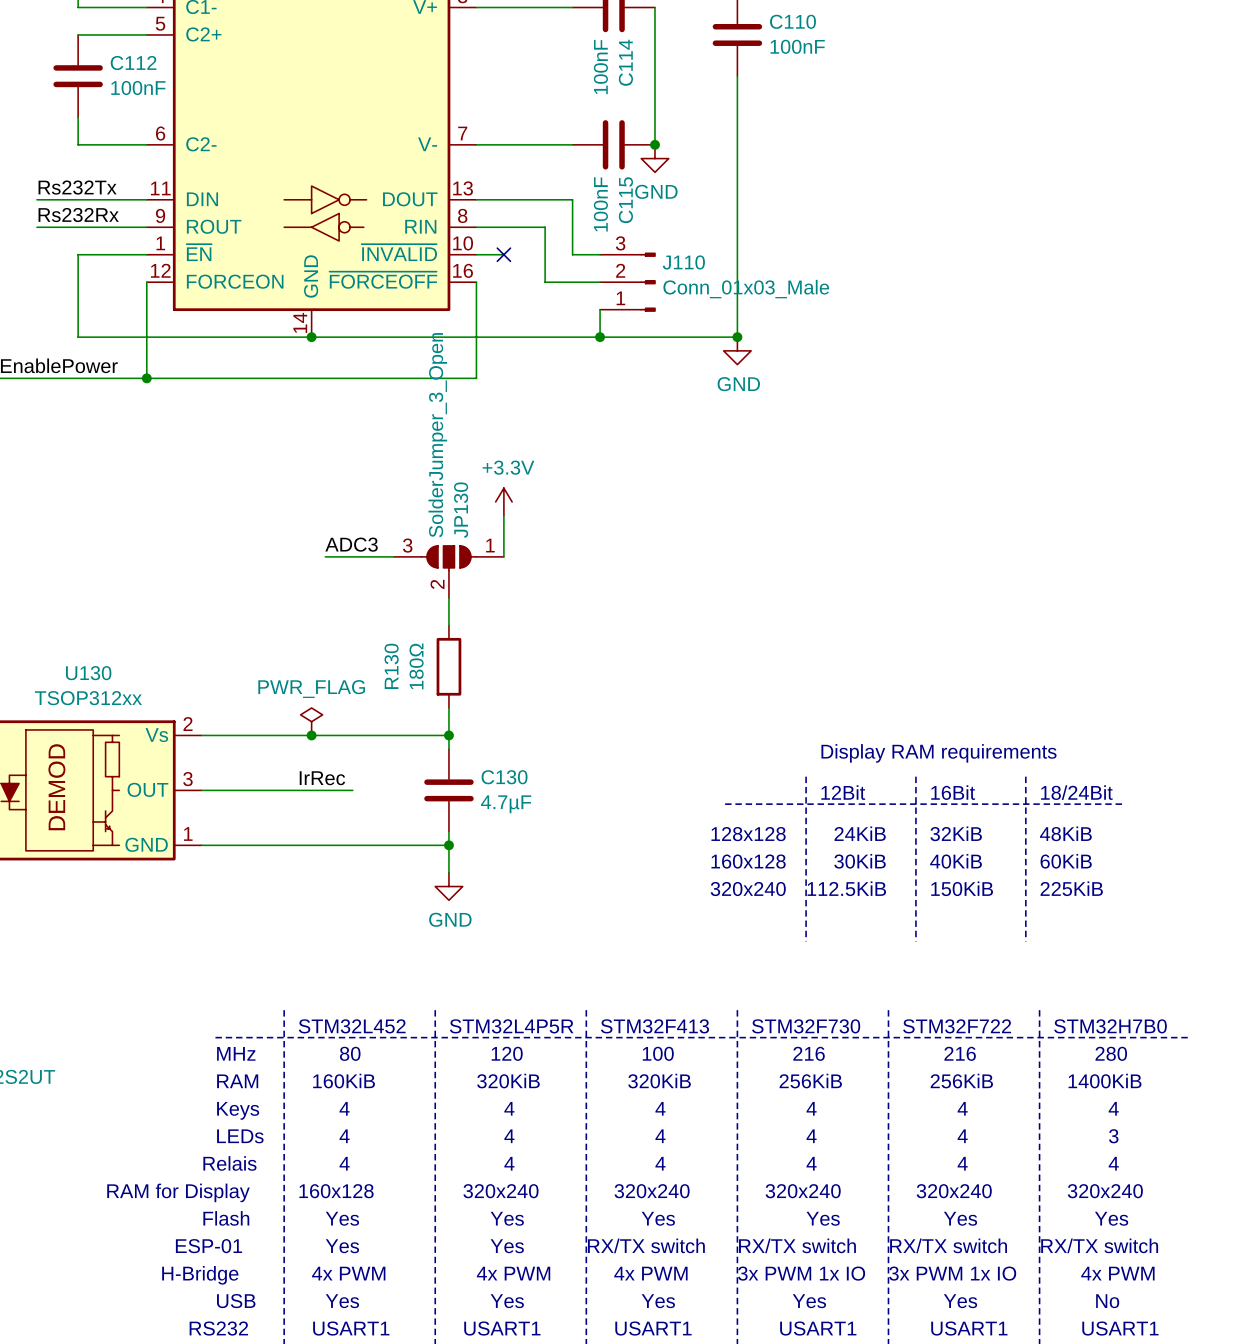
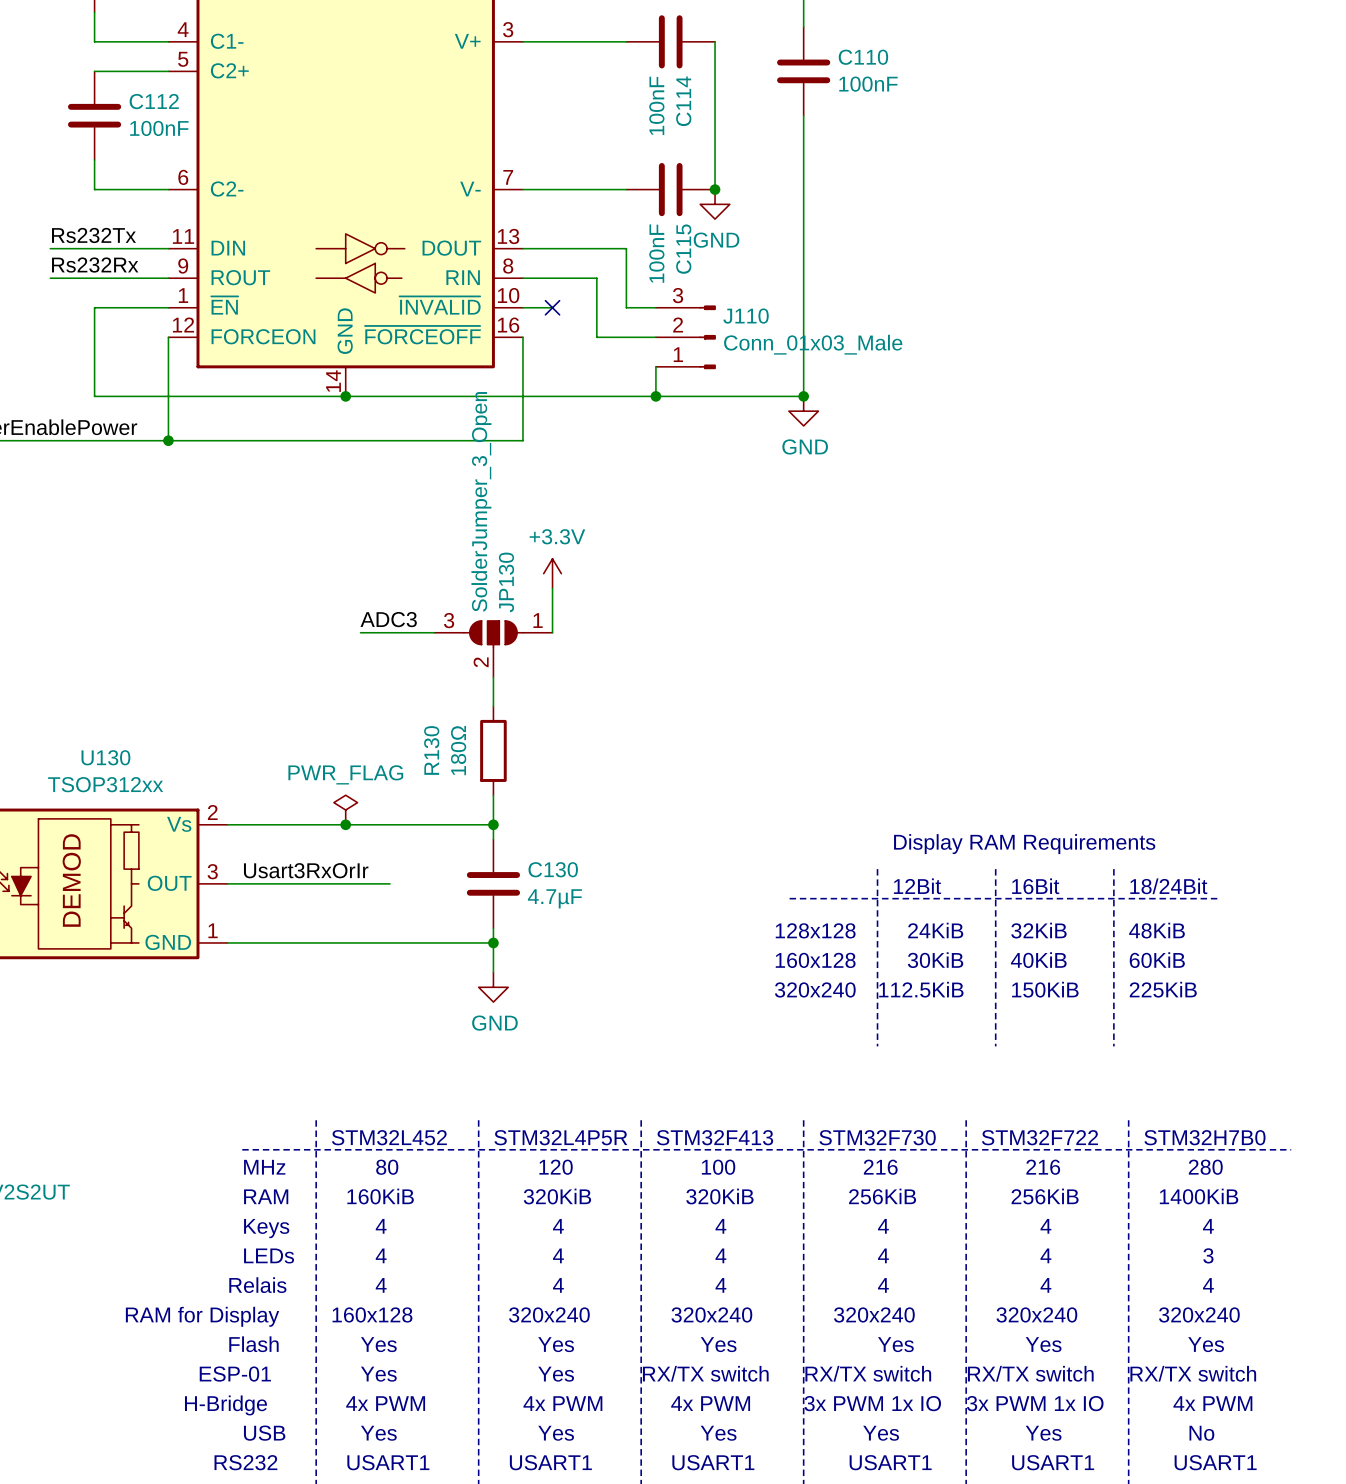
text: Display RAM requirements (938, 753) -> Display RAM Requirements (1024, 844)
label: none -> Usart3RxOrIr (306, 870)
label: IrRec (322, 778) -> none

